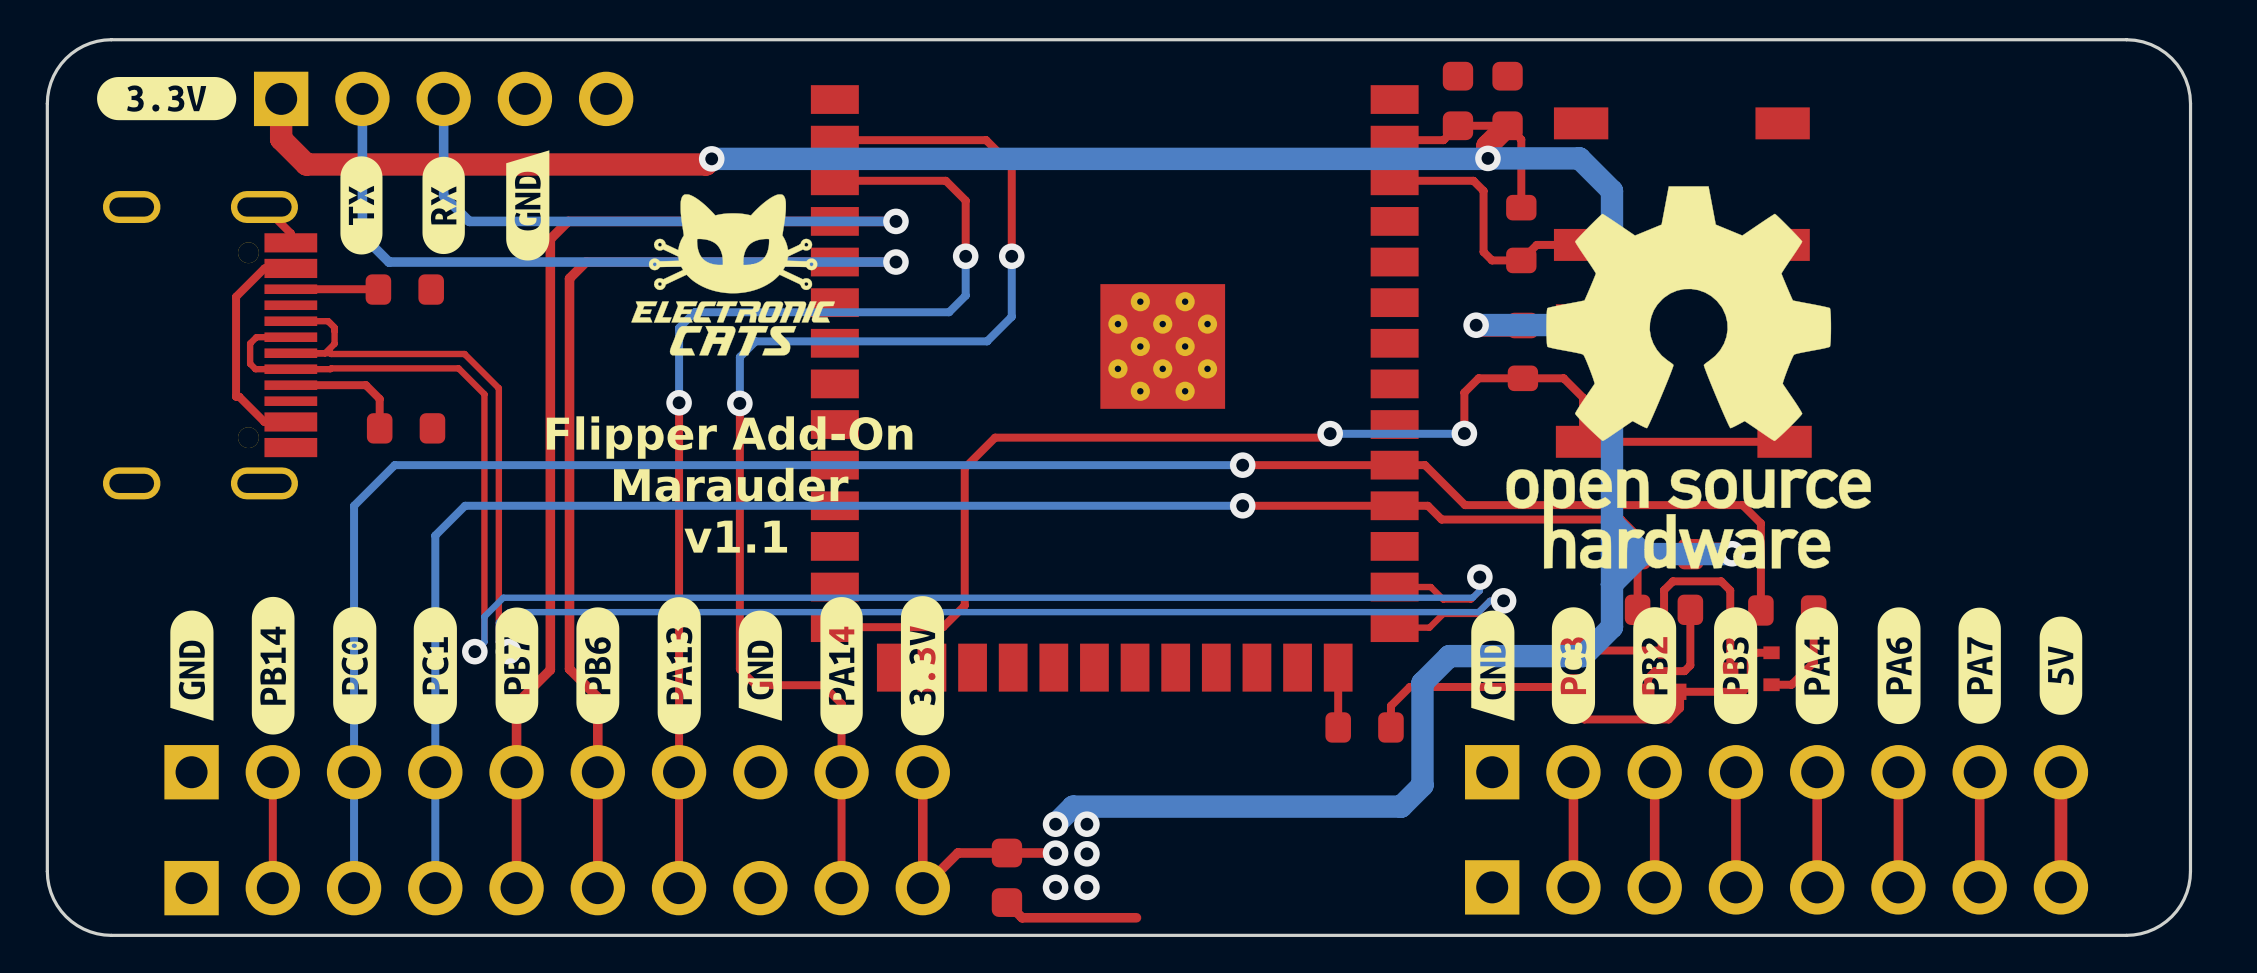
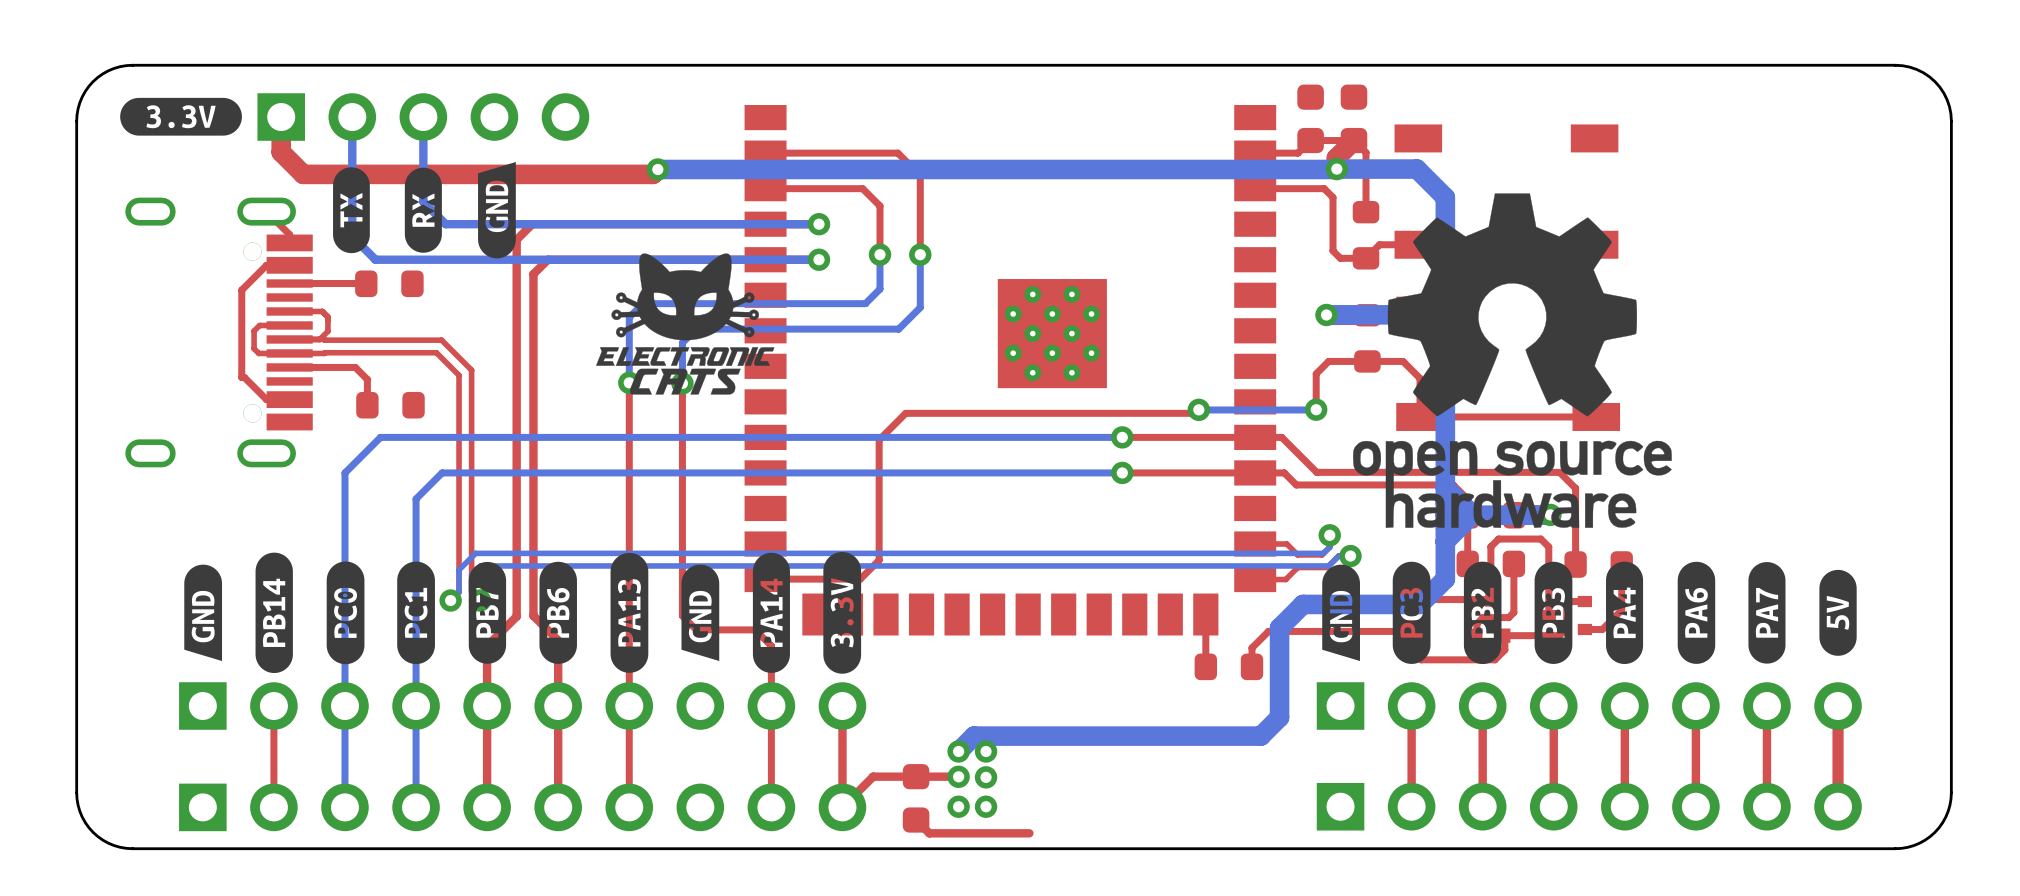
drawing position: (733, 274) -> (685, 324)
text: Flipper Add-On (729, 437) -> none
text: Marauder (731, 484) -> none
text: v1.1 (735, 536) -> none

